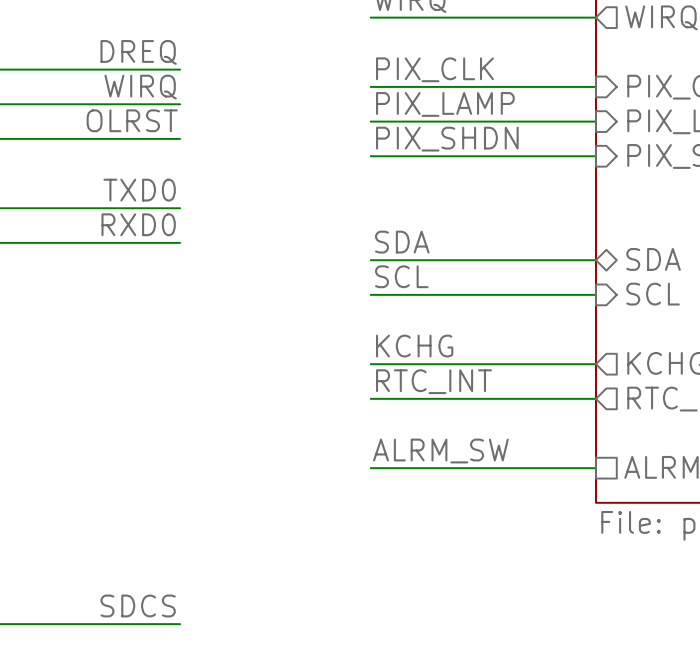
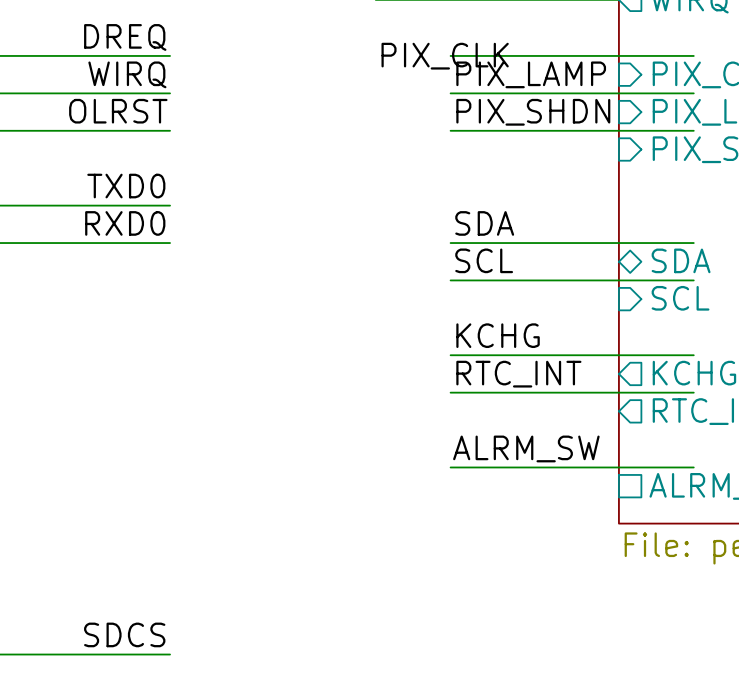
wire: (370, 86) (595, 86) -> (450, 55) (693, 55)
label position: PIX_LAMP (445, 104) -> PIX_LAMP (531, 74)
wire: (370, 121) (595, 121) -> (450, 93) (693, 93)
label position: PIX_SHDN (447, 139) -> PIX_SHDN (533, 112)
wire: (370, 156) (595, 156) -> (450, 130) (693, 130)
label position: SDA (402, 242) -> SDA (484, 223)
wire: (370, 260) (595, 260) -> (450, 243) (693, 243)
label position: SCL (401, 276) -> SCL (484, 260)
wire: (370, 294) (595, 294) -> (450, 280) (693, 280)
label position: KCHG (414, 346) -> KCHG (498, 335)
wire: (370, 364) (595, 364) -> (450, 355) (693, 355)
label position: RTC_INT (433, 381) -> RTC_INT (518, 374)
wire: (370, 398) (595, 398) -> (450, 392) (693, 392)
label position: ALRM_SW (440, 451) -> ALRM_SW (526, 448)
wire: (370, 468) (595, 468) -> (450, 467) (693, 467)

